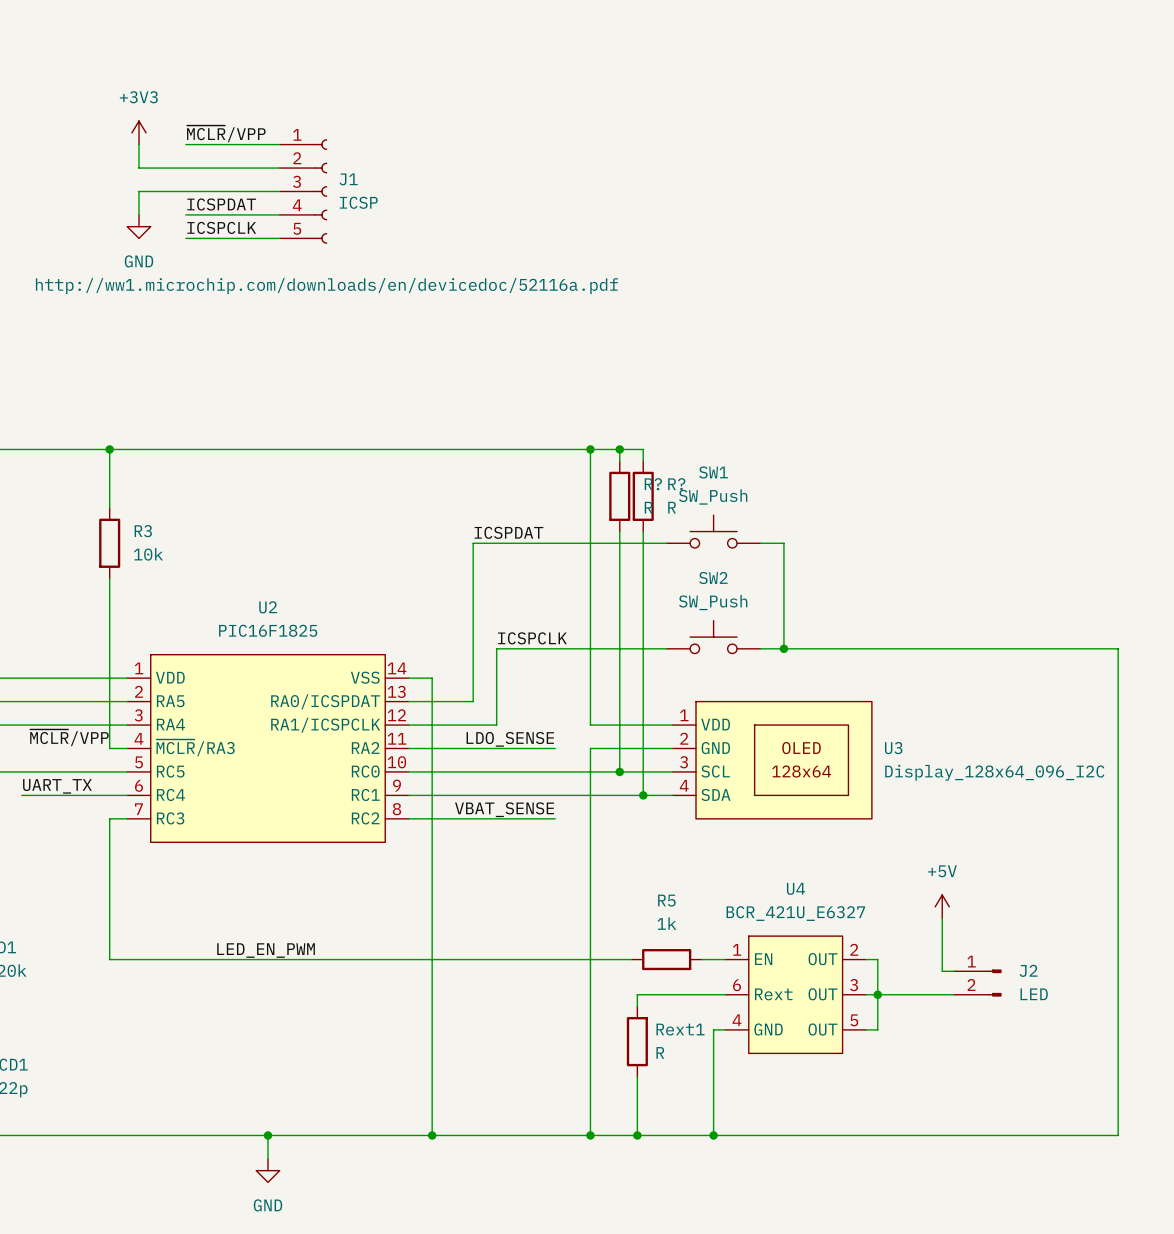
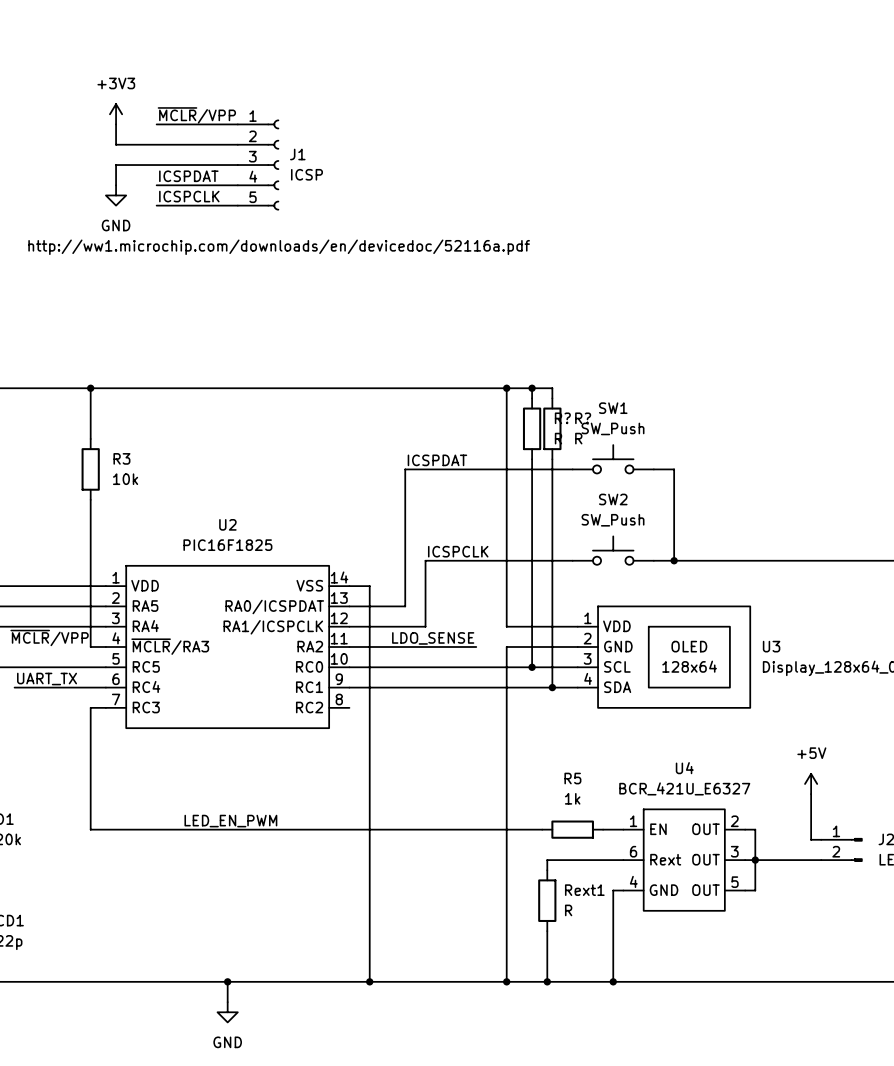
label: VBAT_SENSE (504, 809) -> none
wire: (408, 818) (555, 818) -> none

